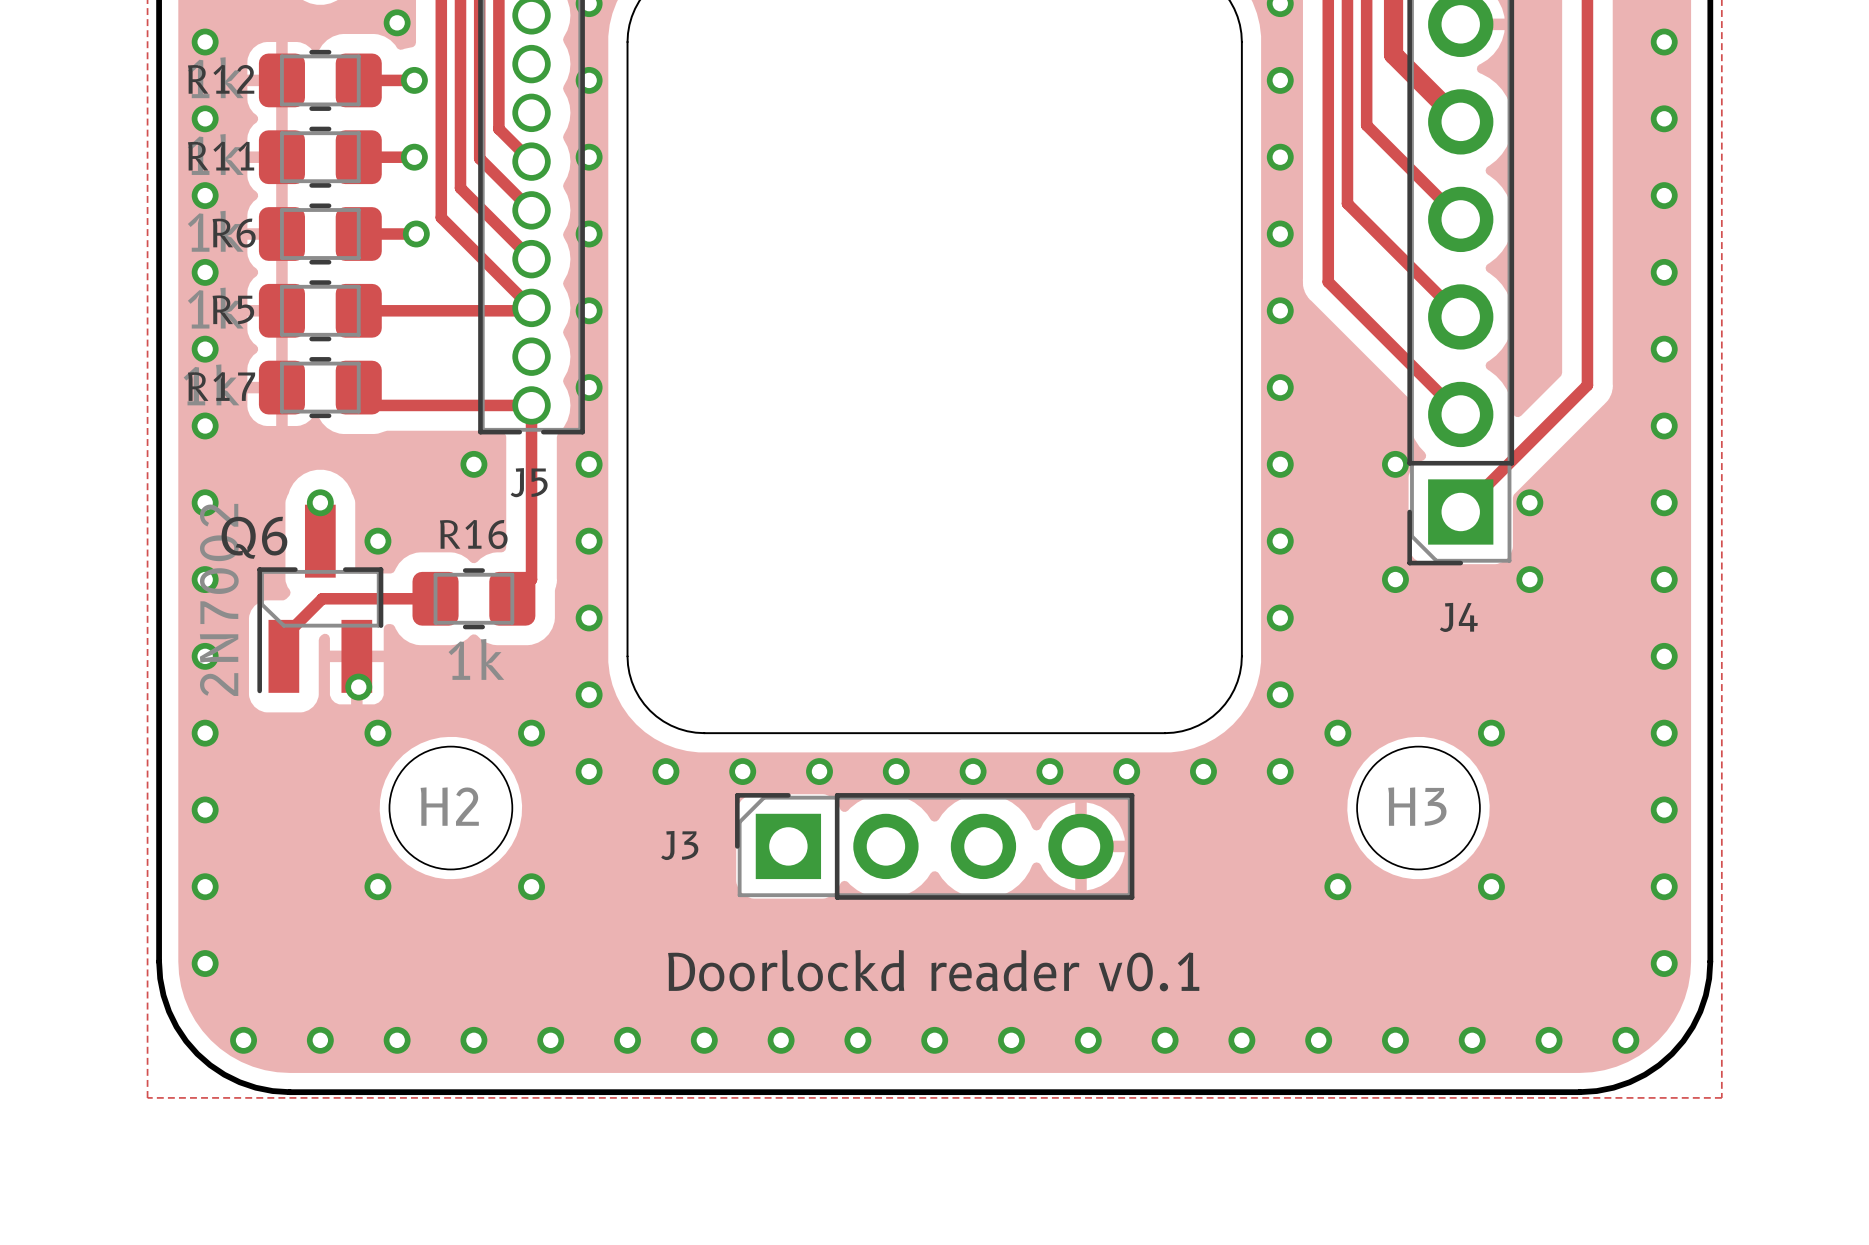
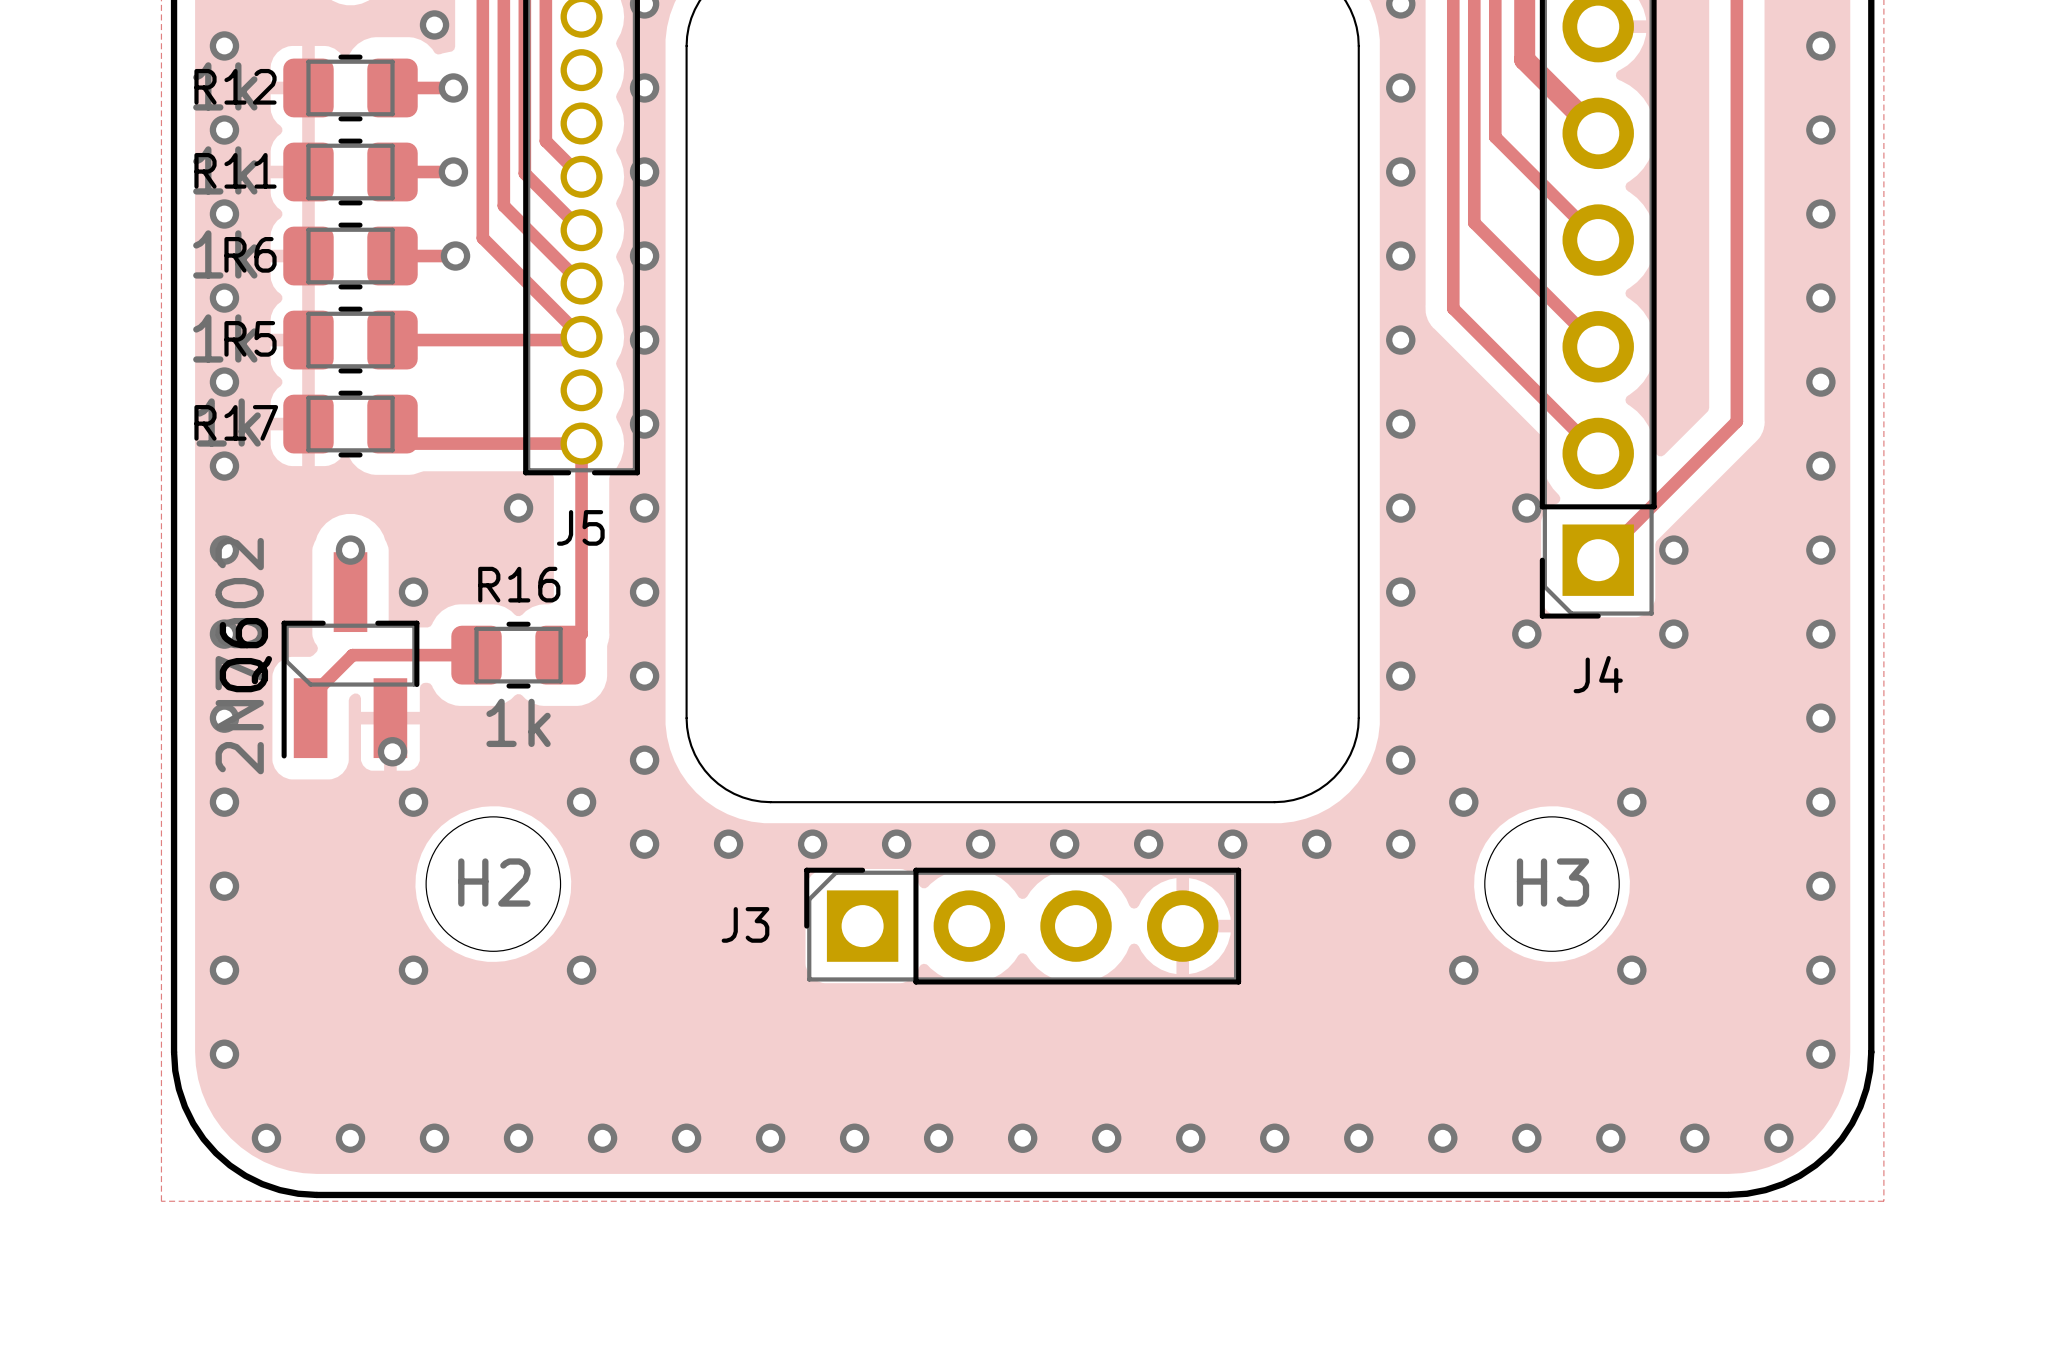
Q6 name rotation: 0° (254, 537) -> 90° counterclockwise (245, 655)
text: Doorlockd reader v0.1 (933, 970) -> none

